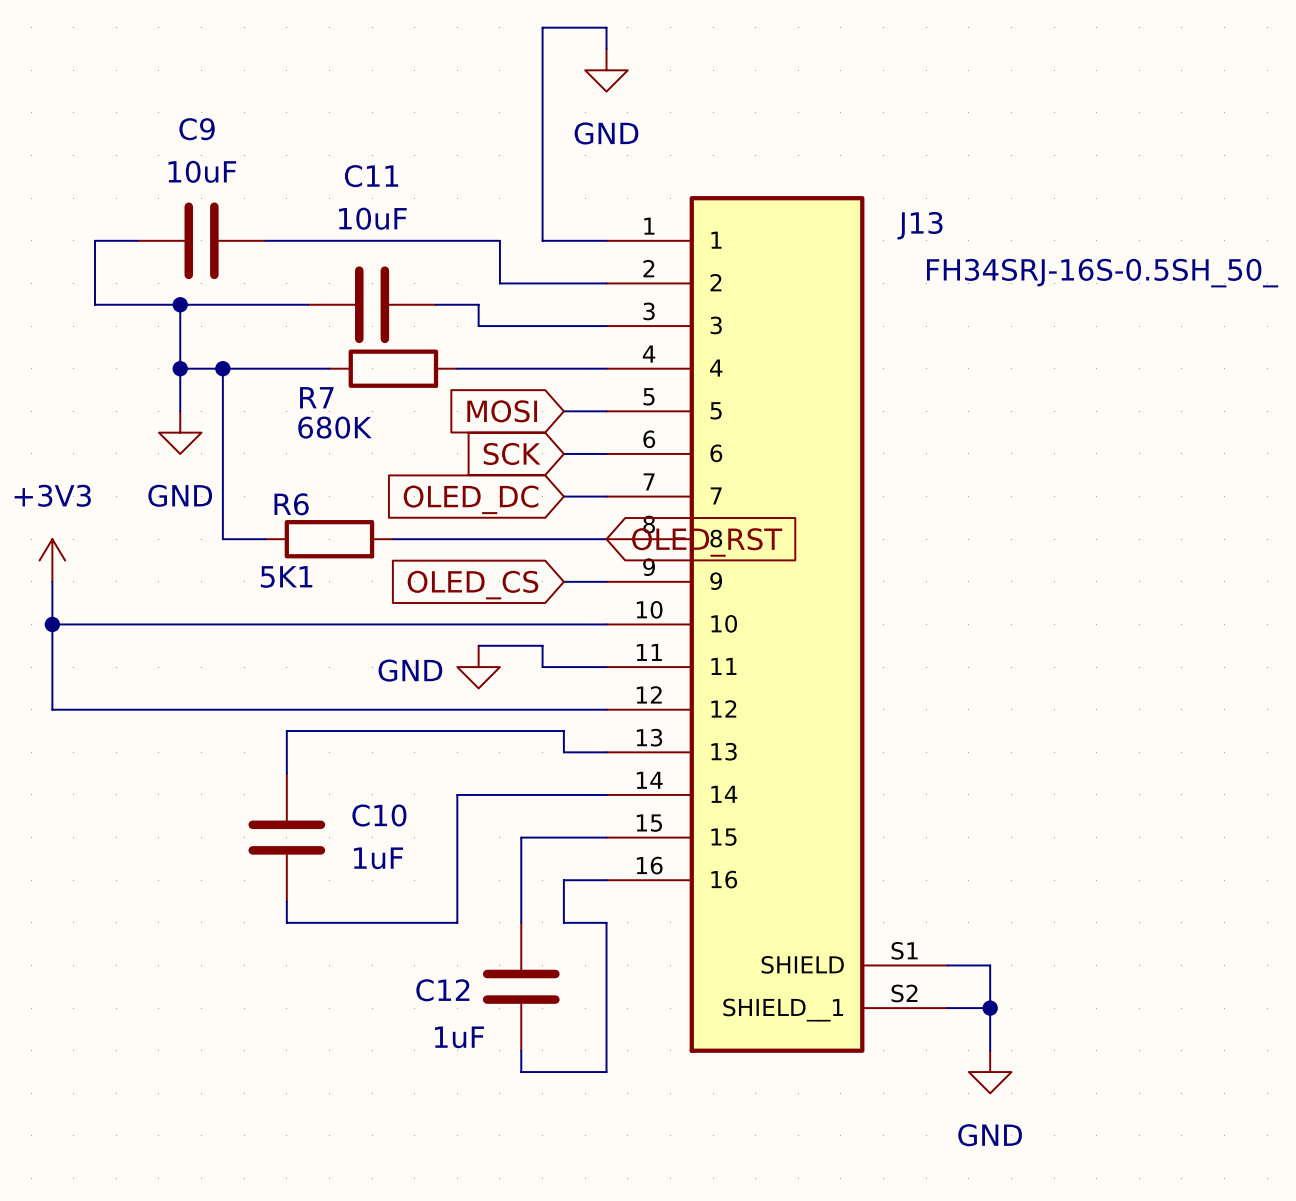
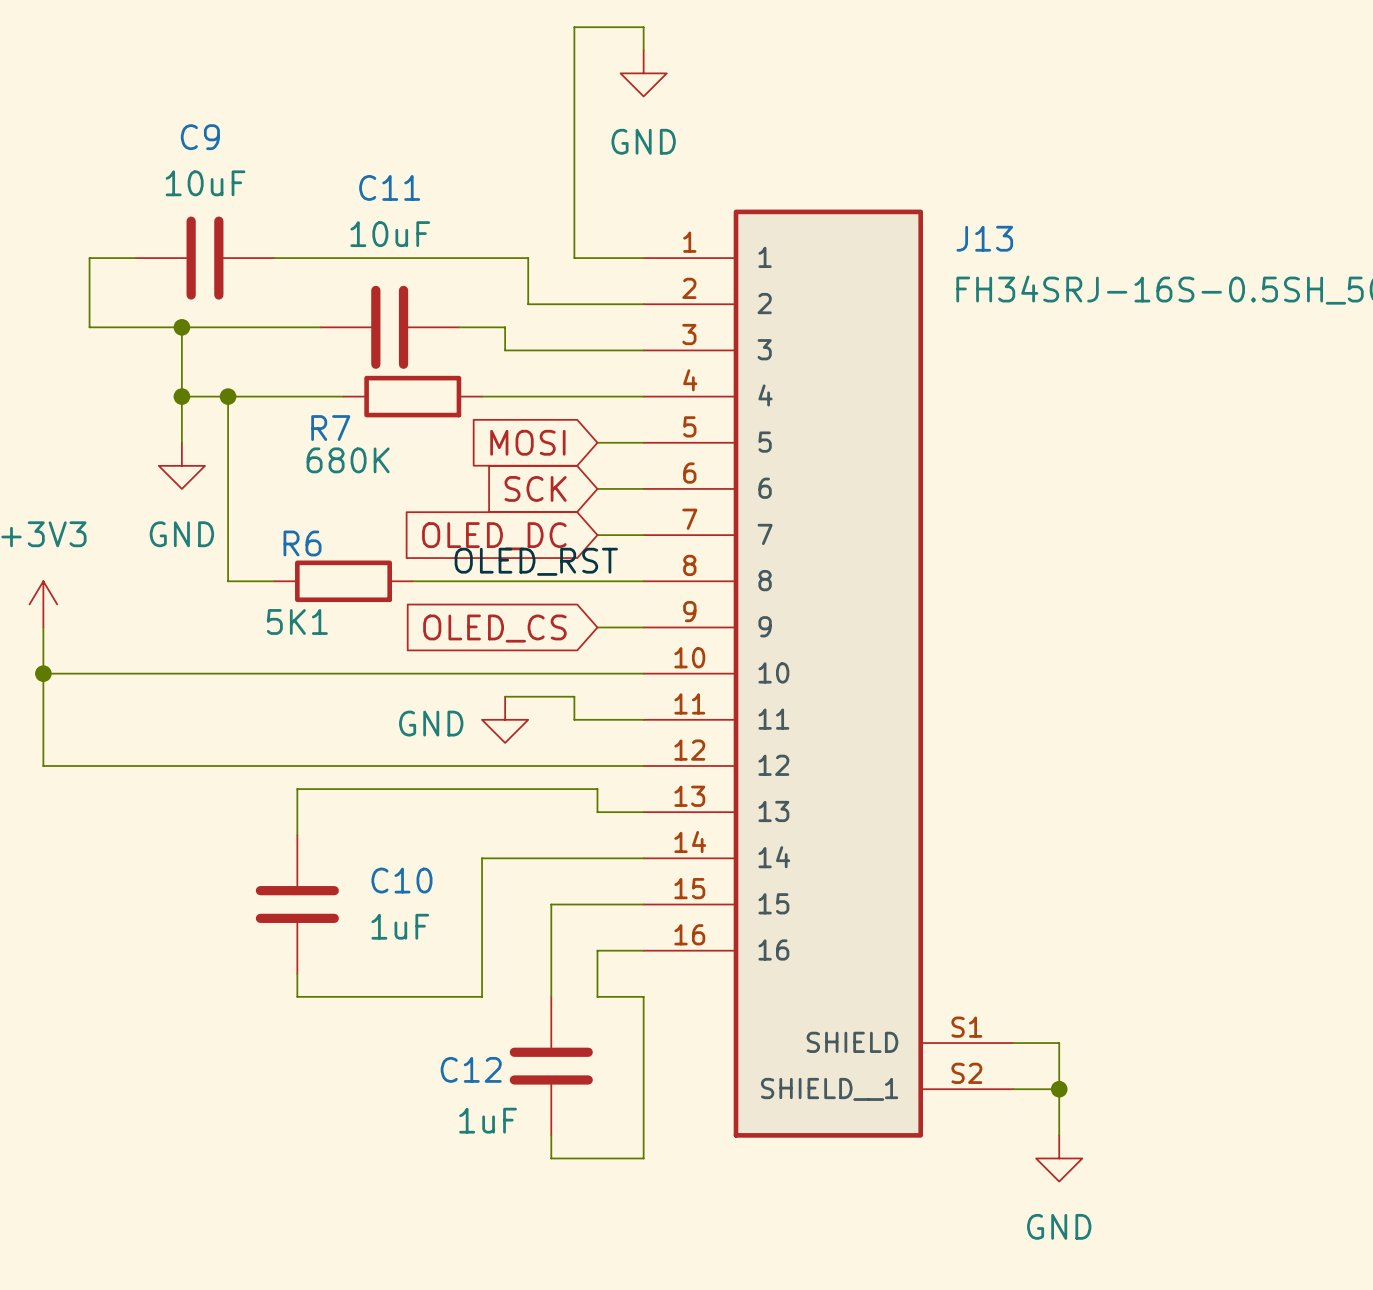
label: none -> OLED_RST (536, 561)
global label: OLED_RST (707, 542) -> none

